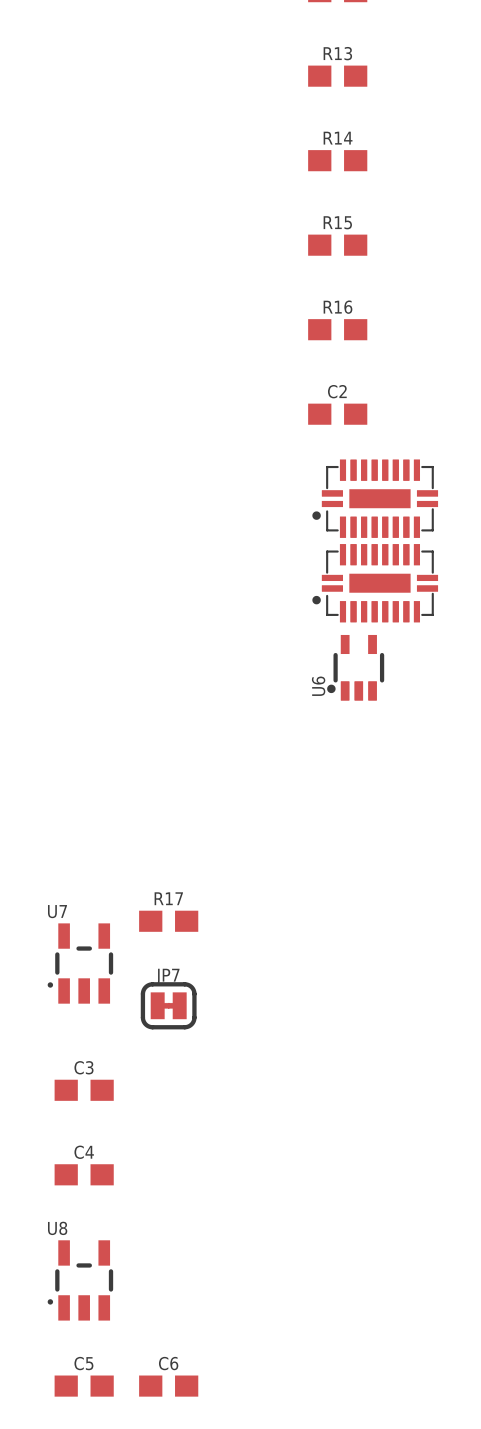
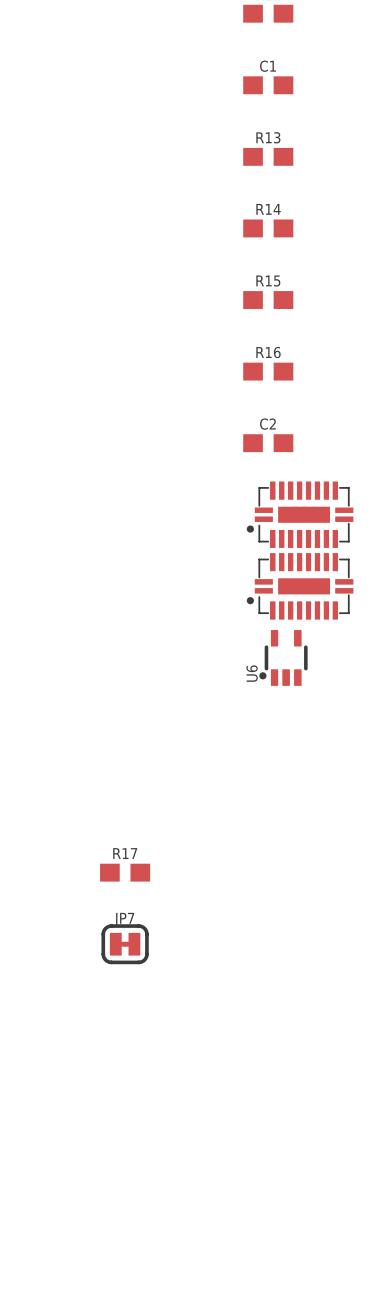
U7: (80, 963) -> none
C3: (84, 1090) -> none
C4: (84, 1174) -> none
U8: (80, 1280) -> none
C5: (84, 1386) -> none
C6: (168, 1386) -> none

